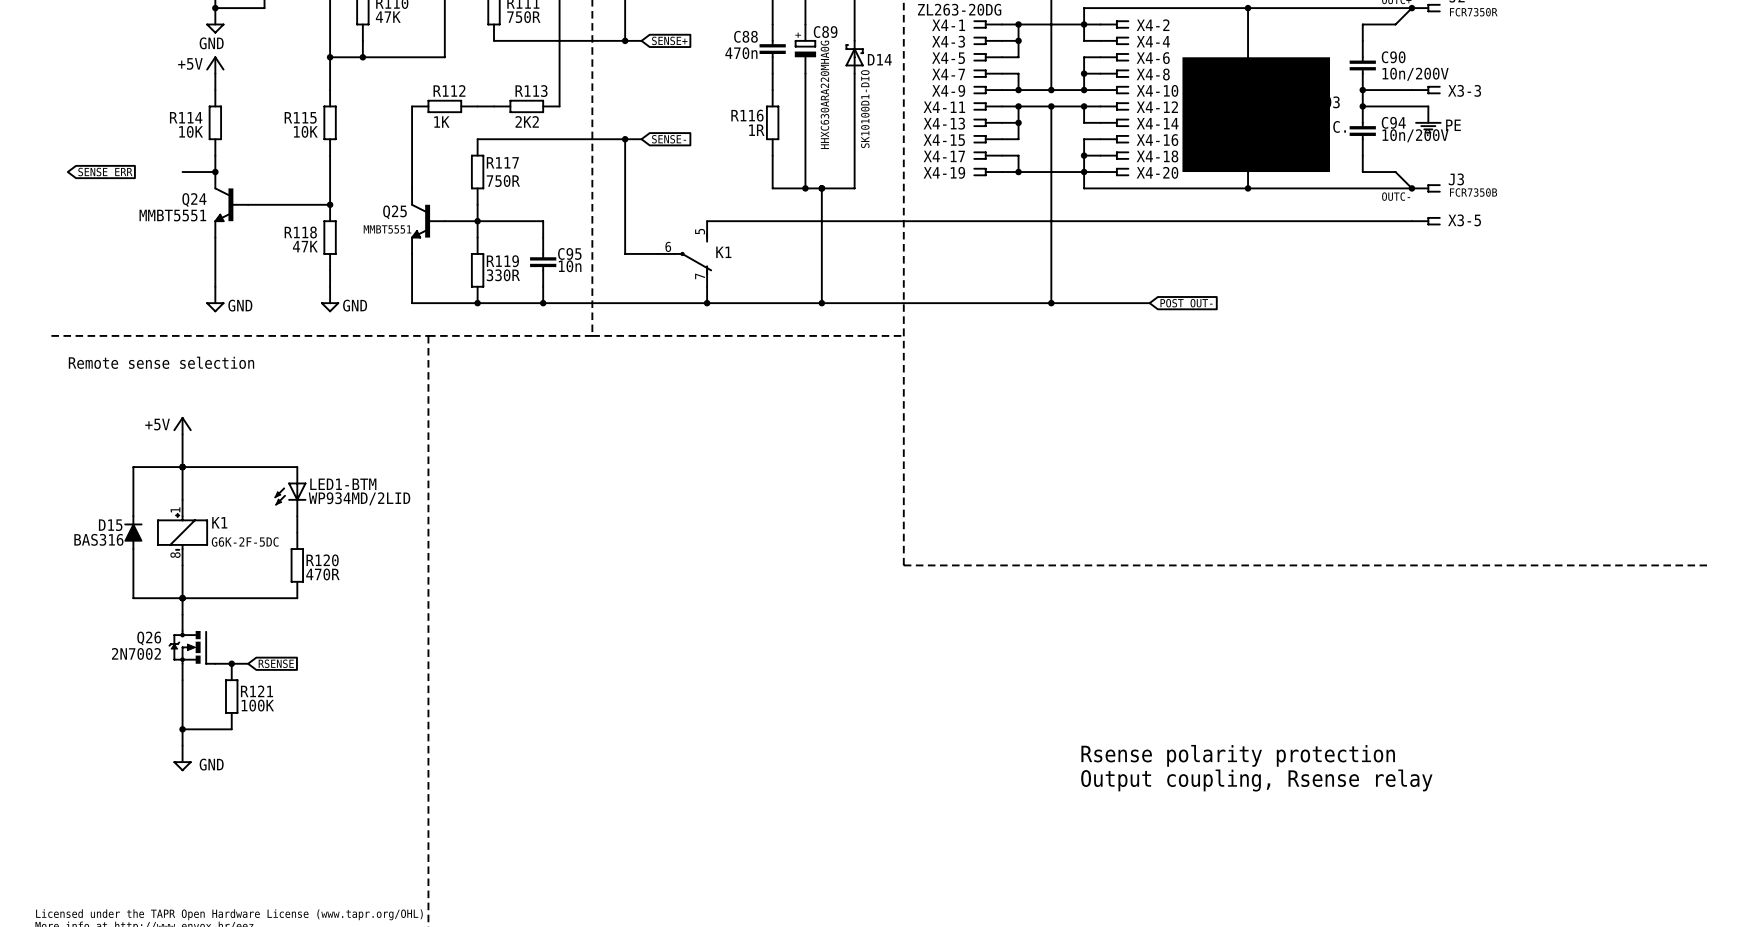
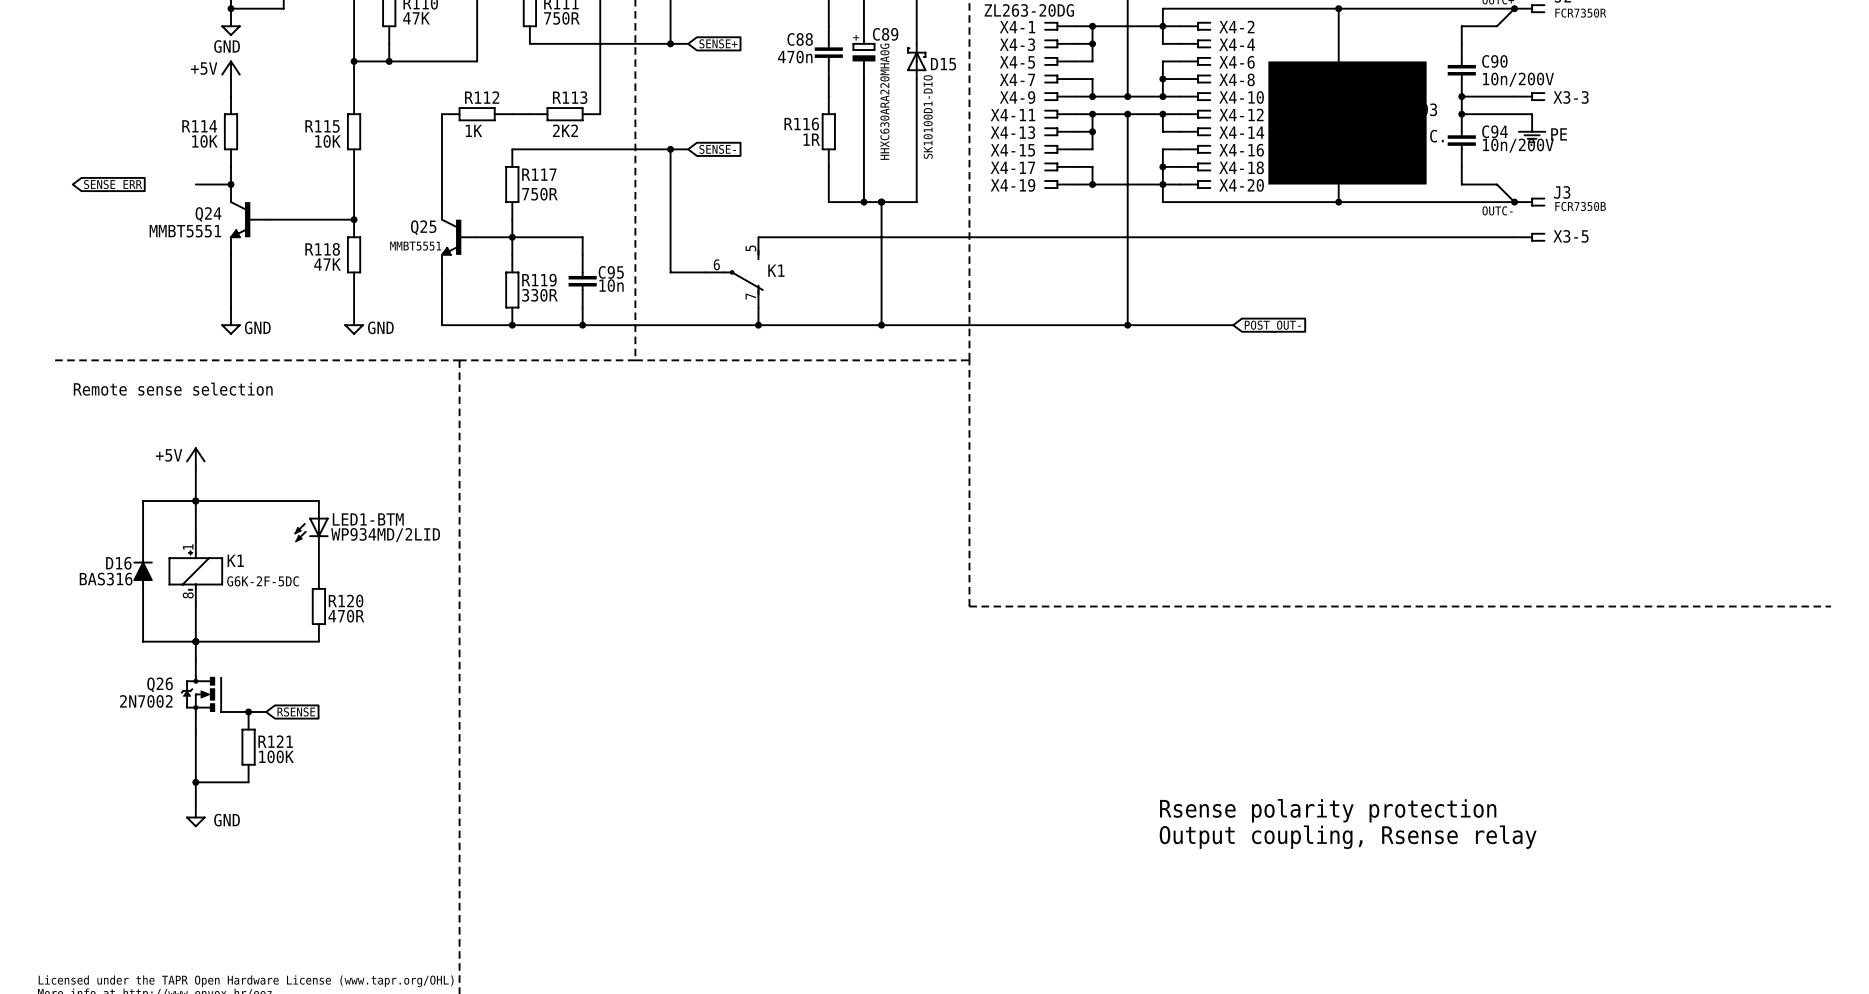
D14 name: D14 (879, 59) -> D15 (943, 64)
D15 name: D15 (110, 525) -> D16 (118, 563)

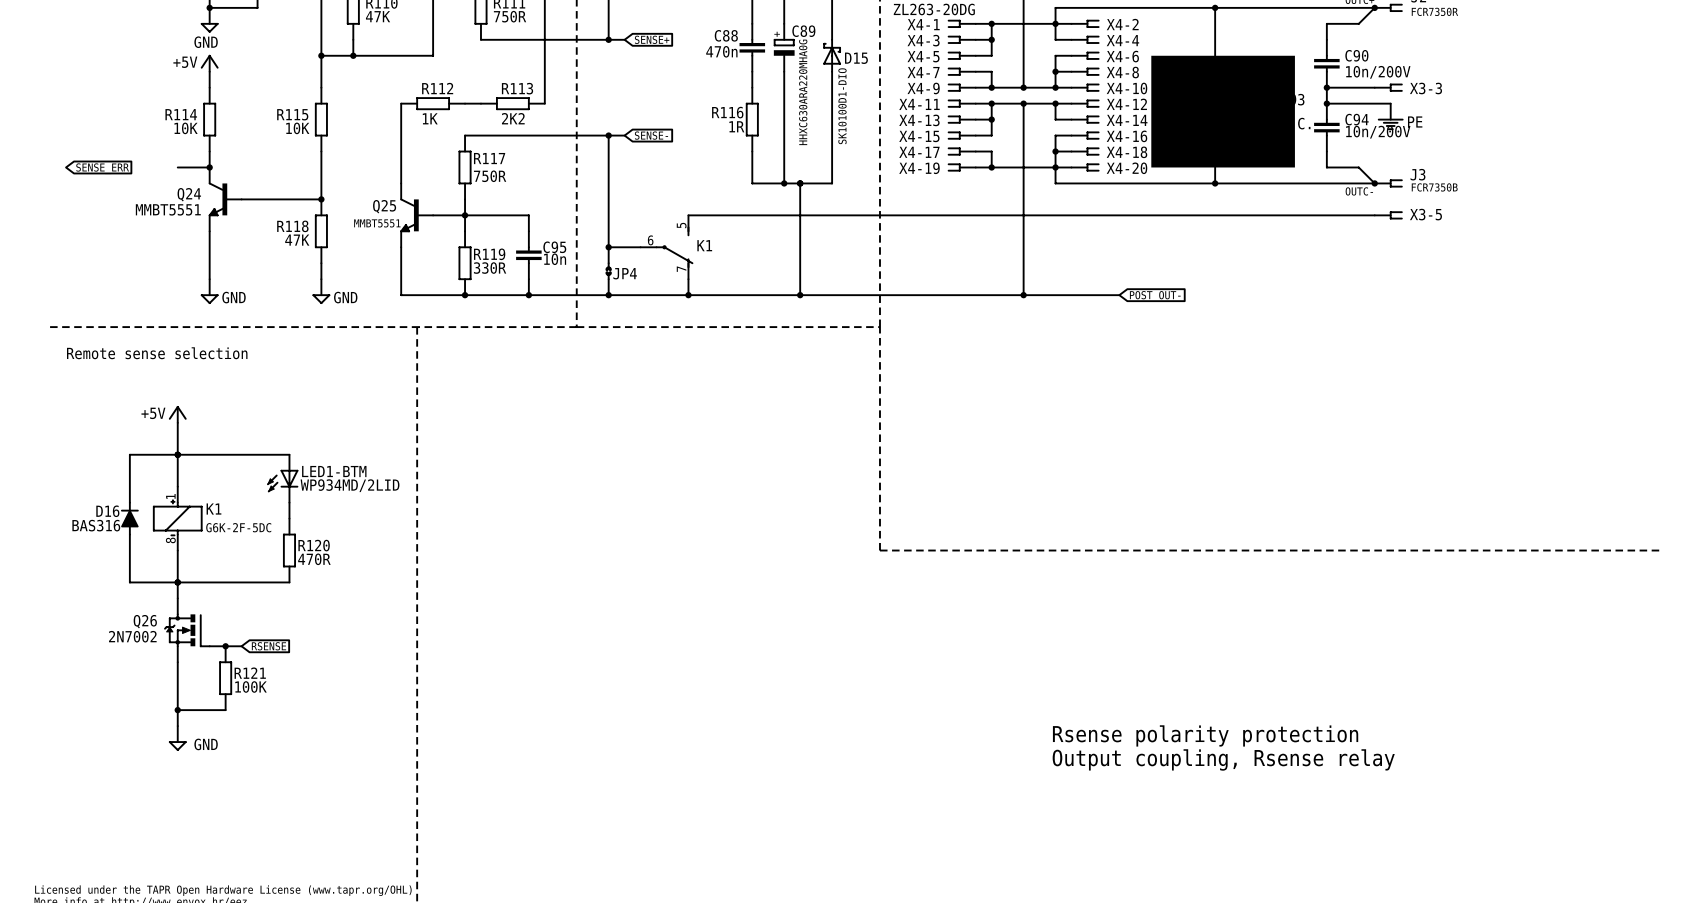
wire: none -> (608, 247) (608, 263)
junction: none -> (608, 247)
JP4: none -> (608, 271)
wire: none -> (608, 279) (608, 295)
junction: none -> (608, 295)

